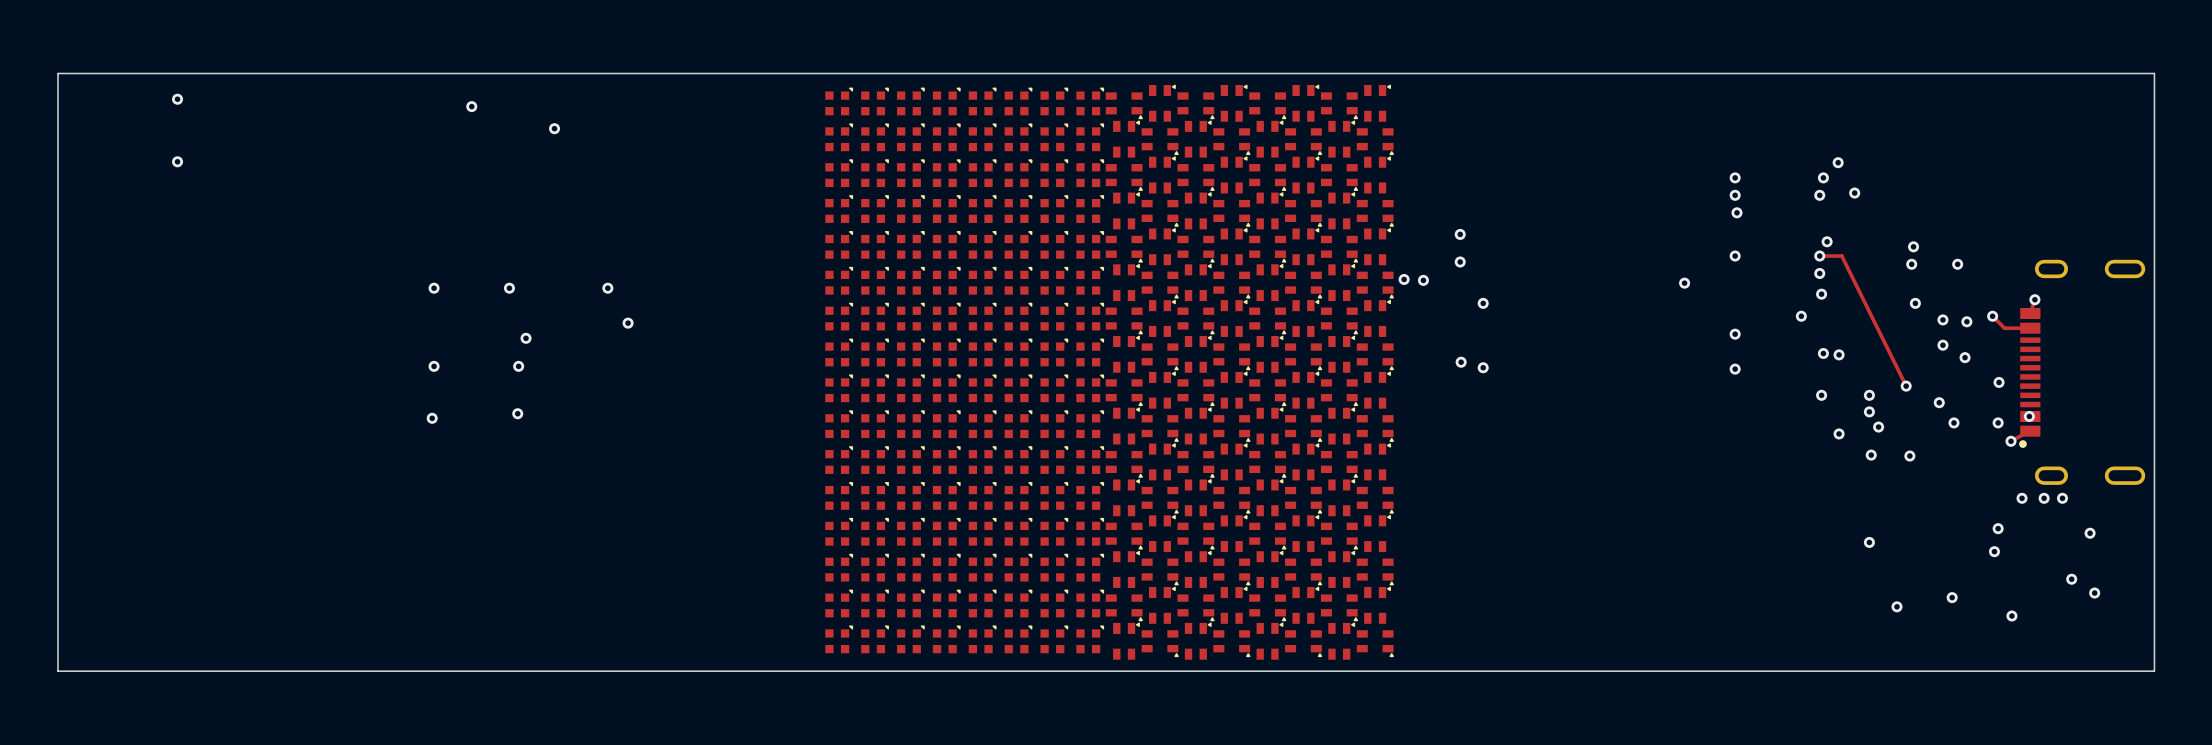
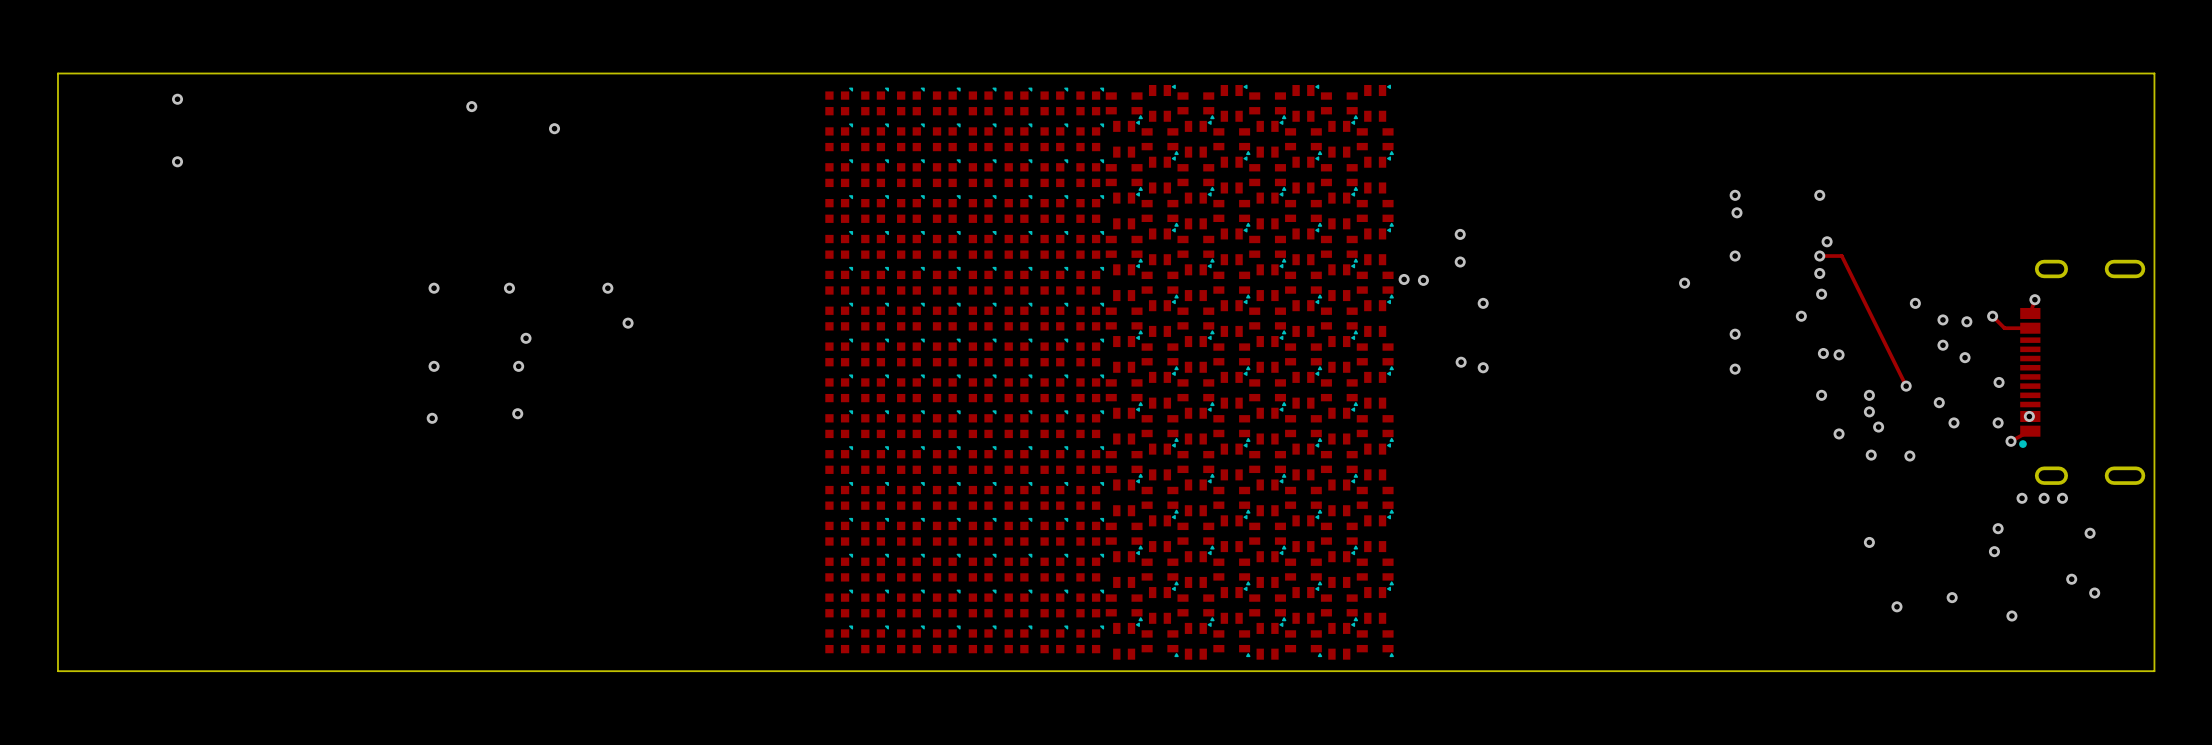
via: (1838, 162) -> none
via: (1735, 177) -> none
via: (1823, 177) -> none
via: (1854, 193) -> none
via: (1913, 246) -> none
via: (1911, 264) -> none
via: (1957, 264) -> none

